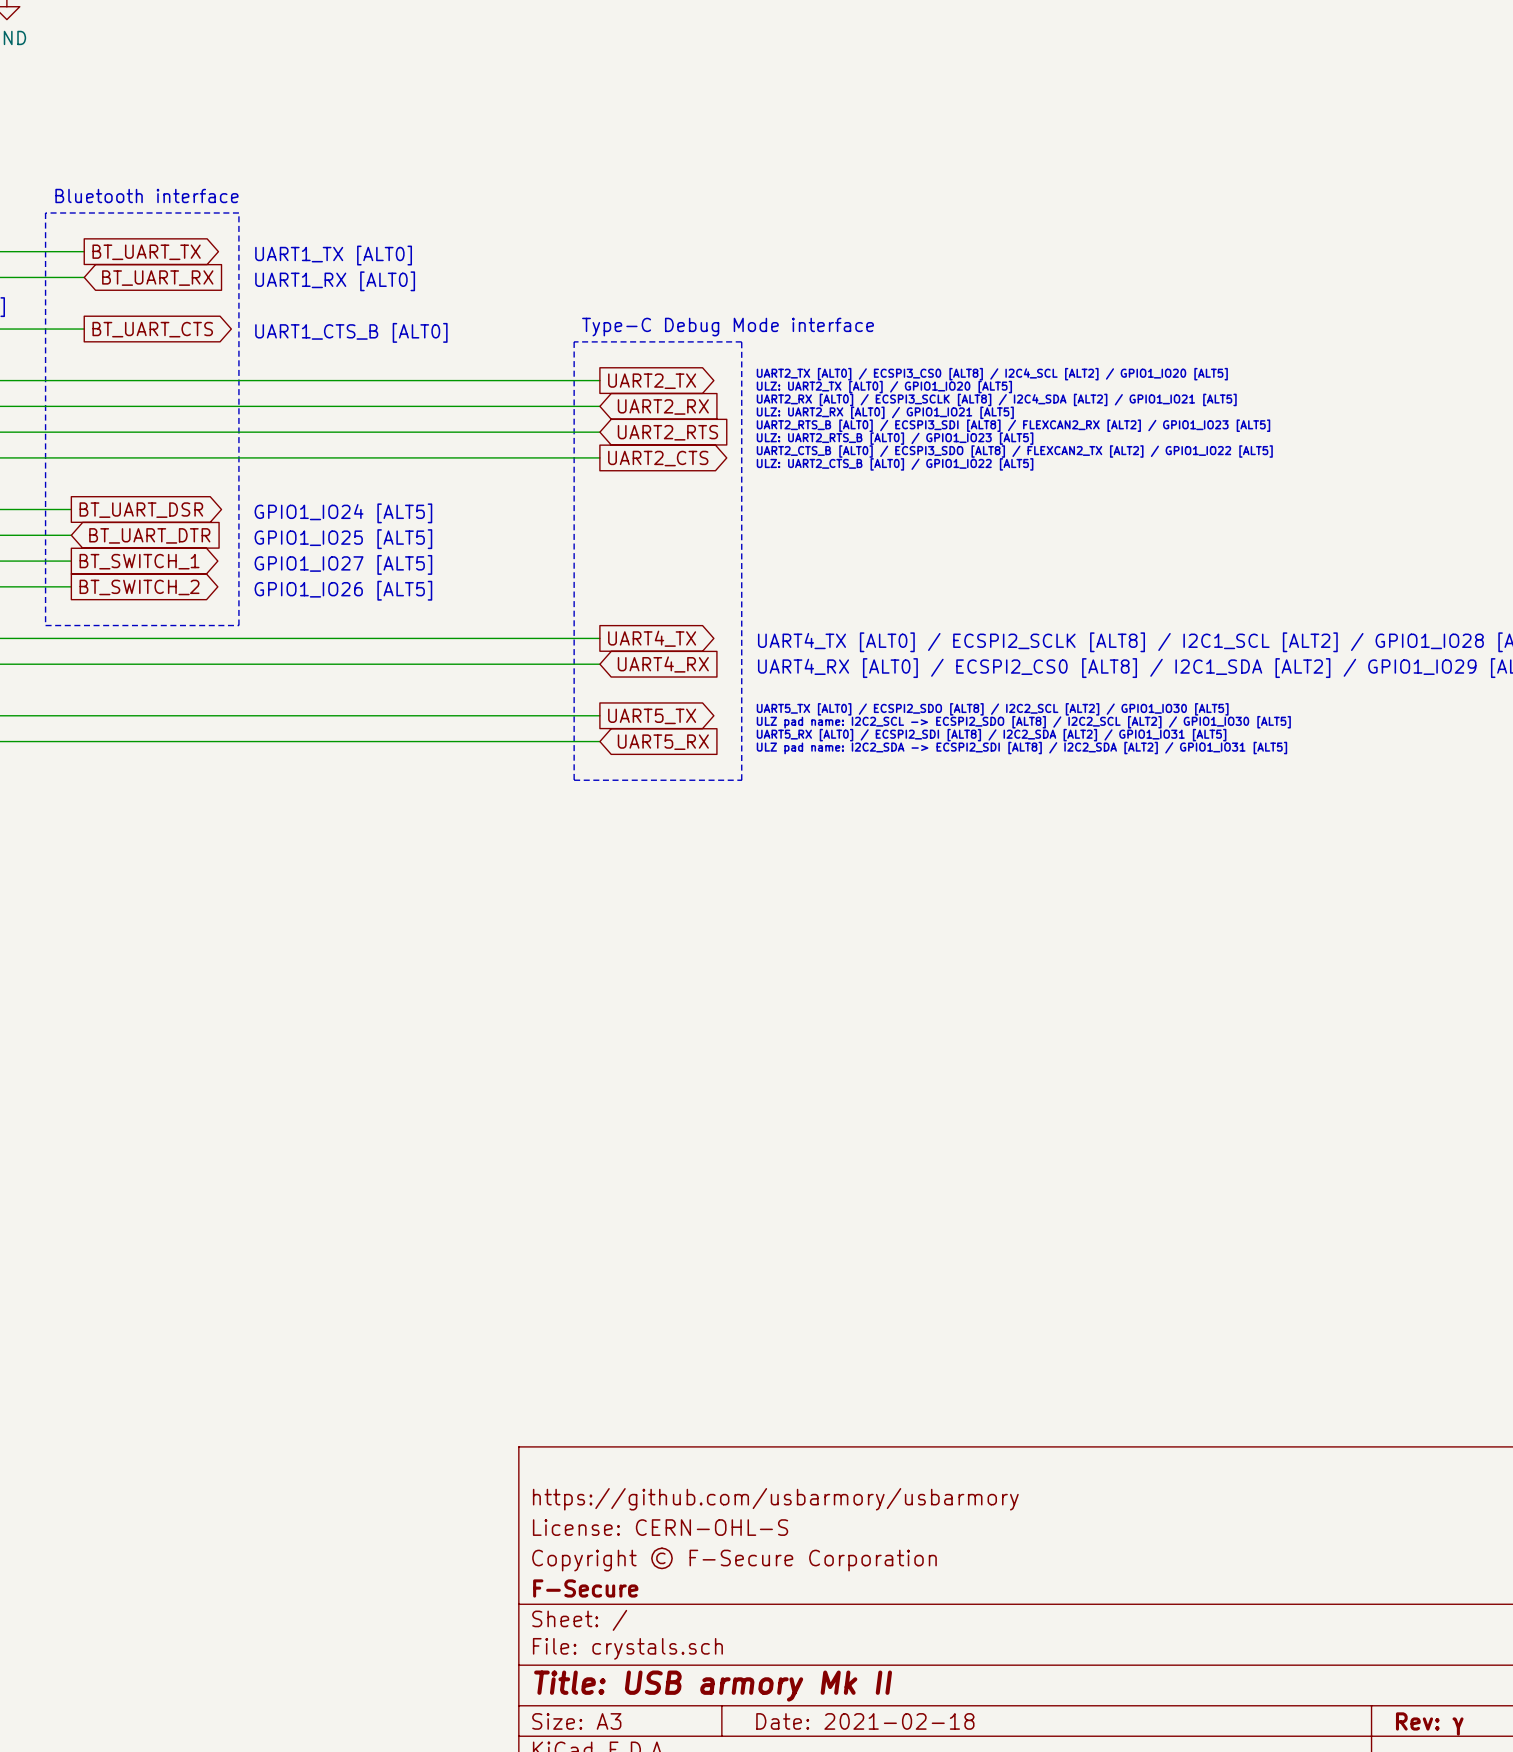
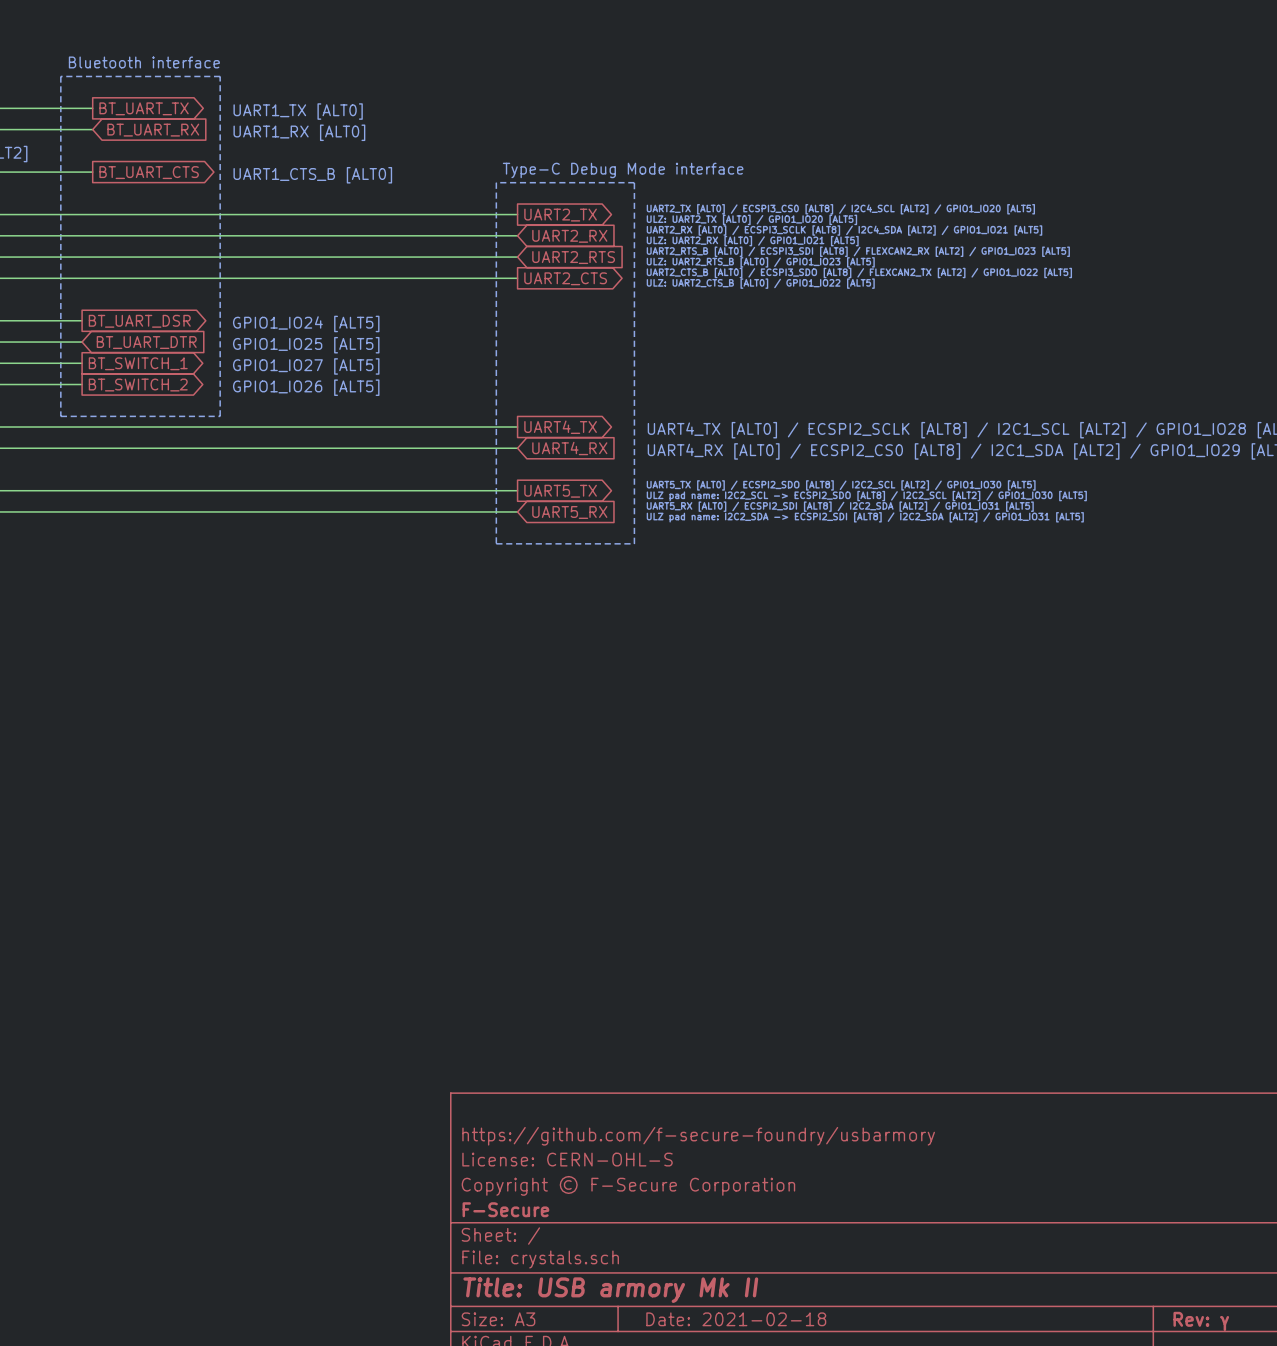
title block: https://github.com/usbarmory/usbarmory (775, 1499) -> https://github.com/f-secure-foundry/usbarmory (698, 1136)

